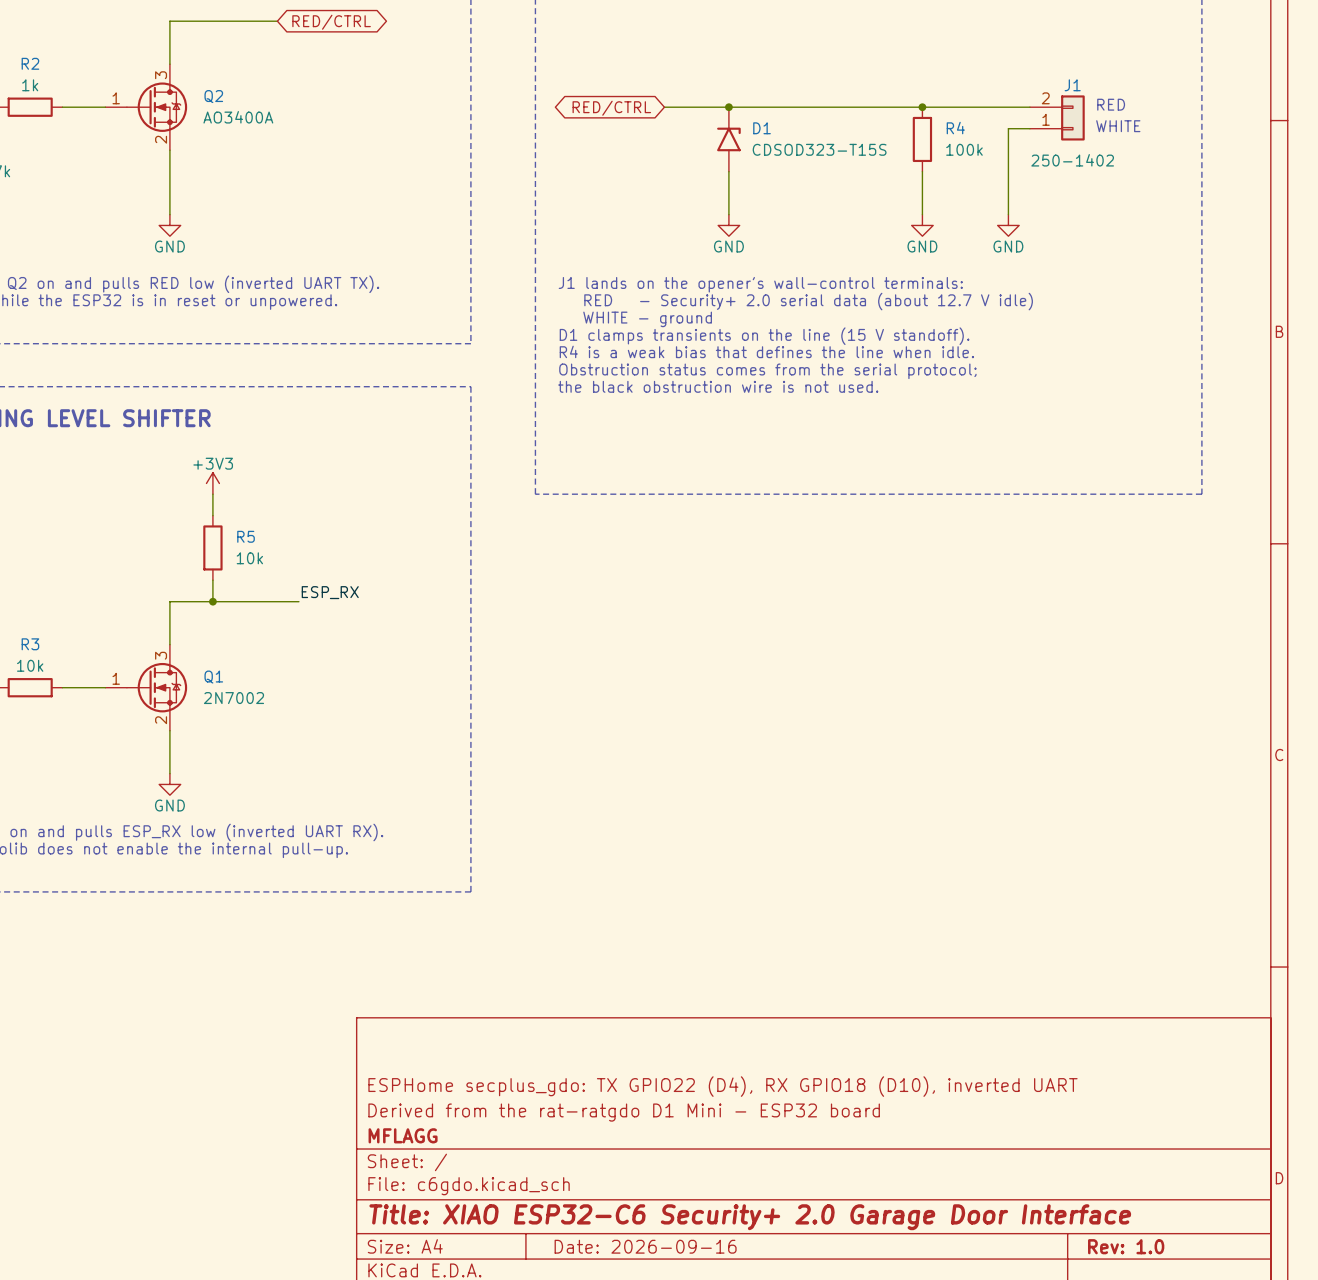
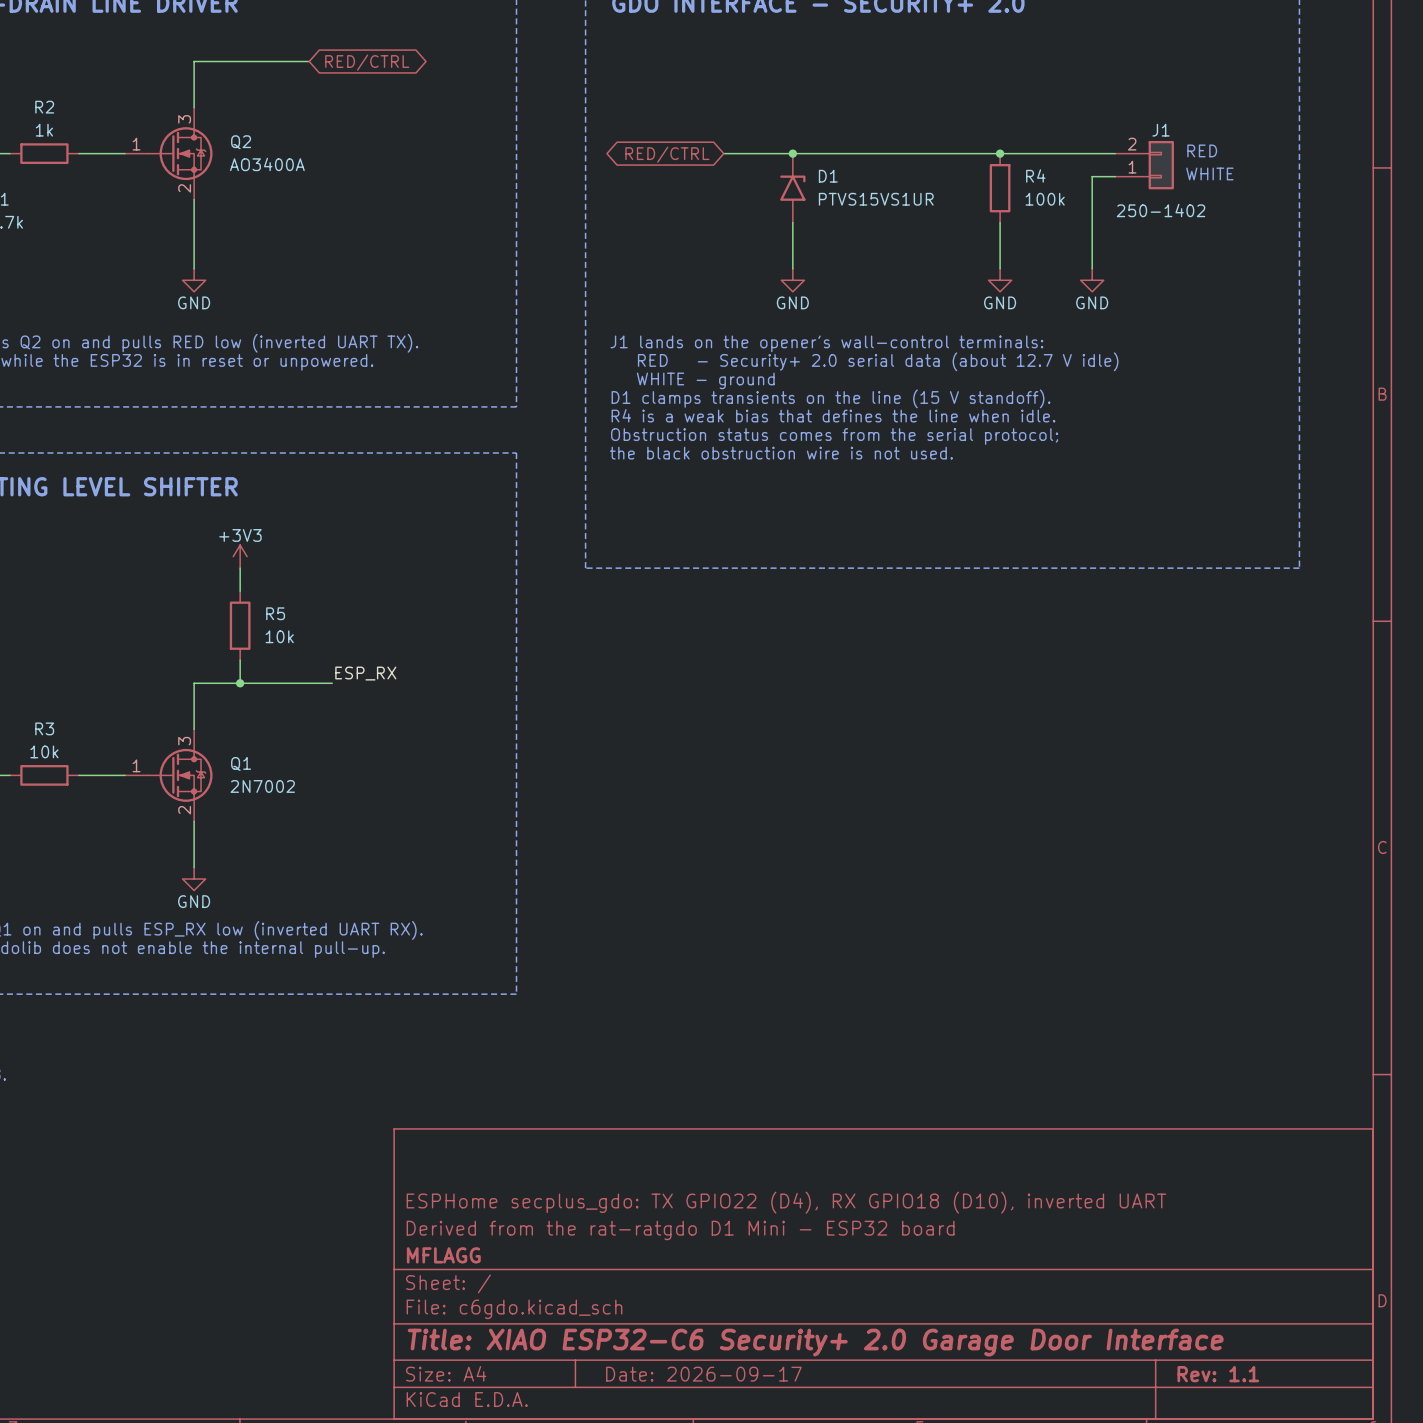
D1 value: CDSOD323-T15S (819, 149) -> PTVS15VS1UR (876, 199)
title block: Date: 2026-09-16 (645, 1246) -> Date: 2026-09-17 (703, 1374)
title block: Rev: 1.0 (1126, 1246) -> Rev: 1.1 (1218, 1374)

